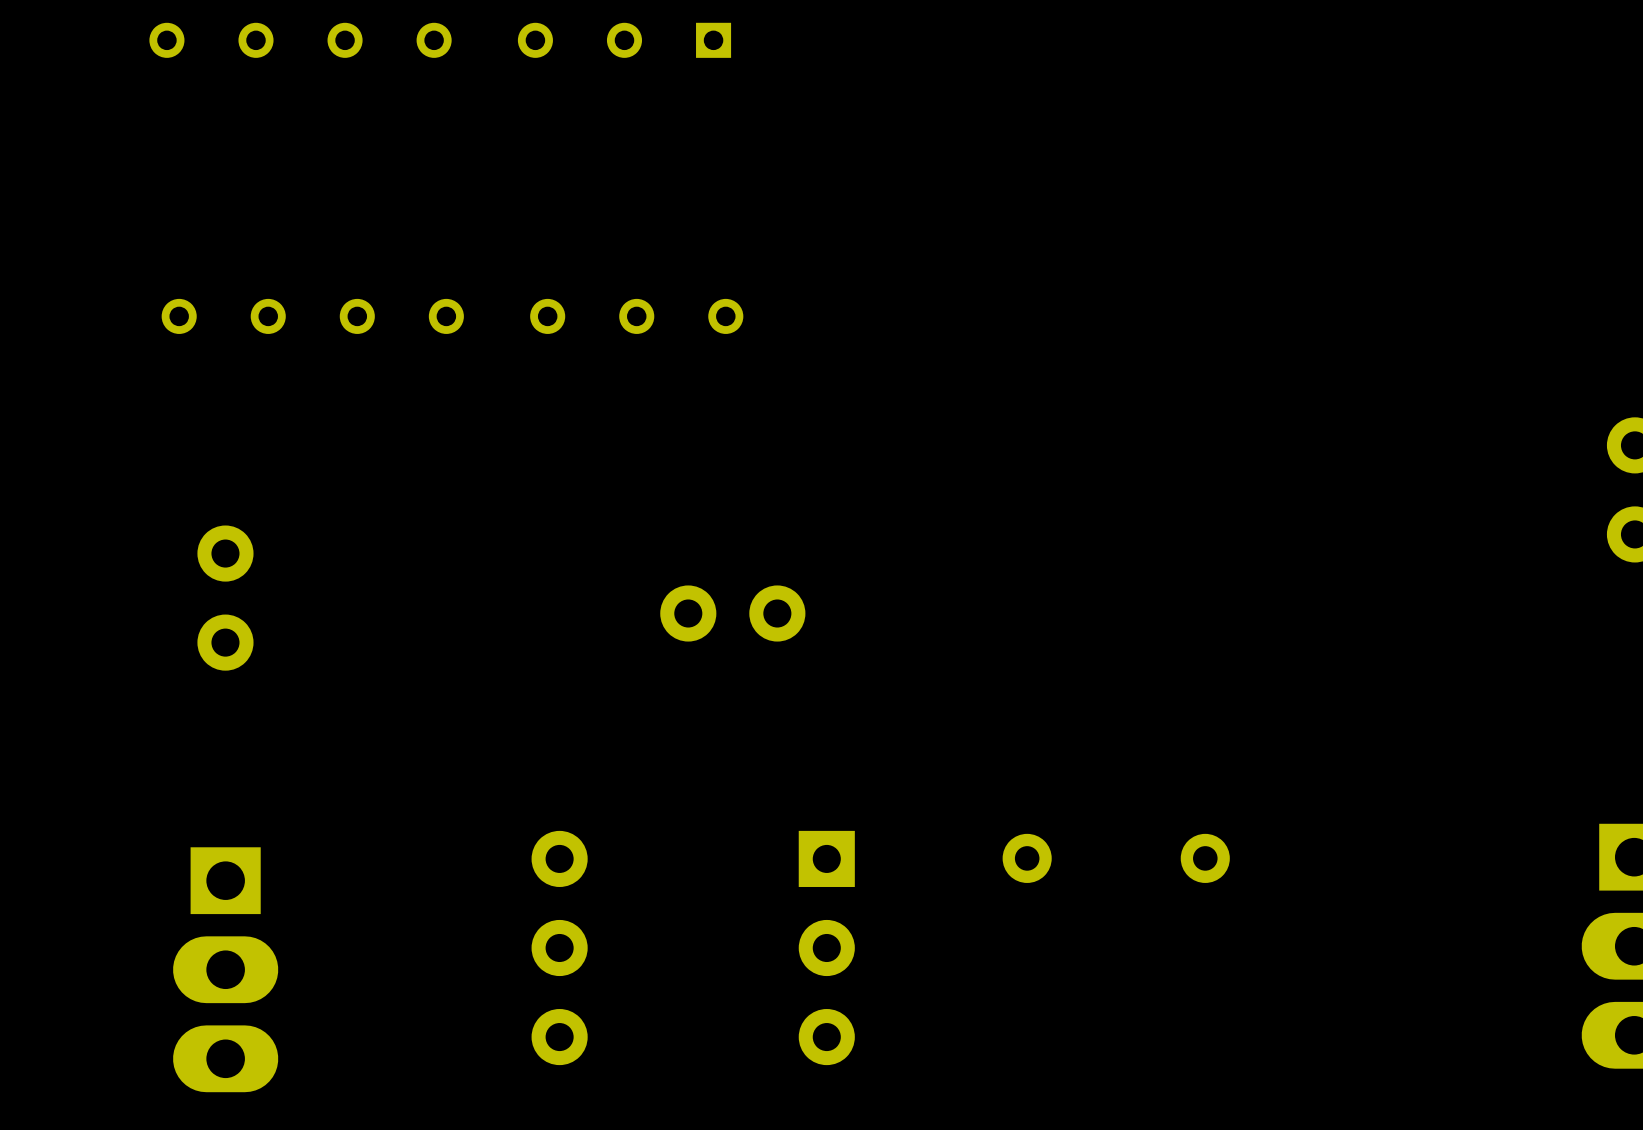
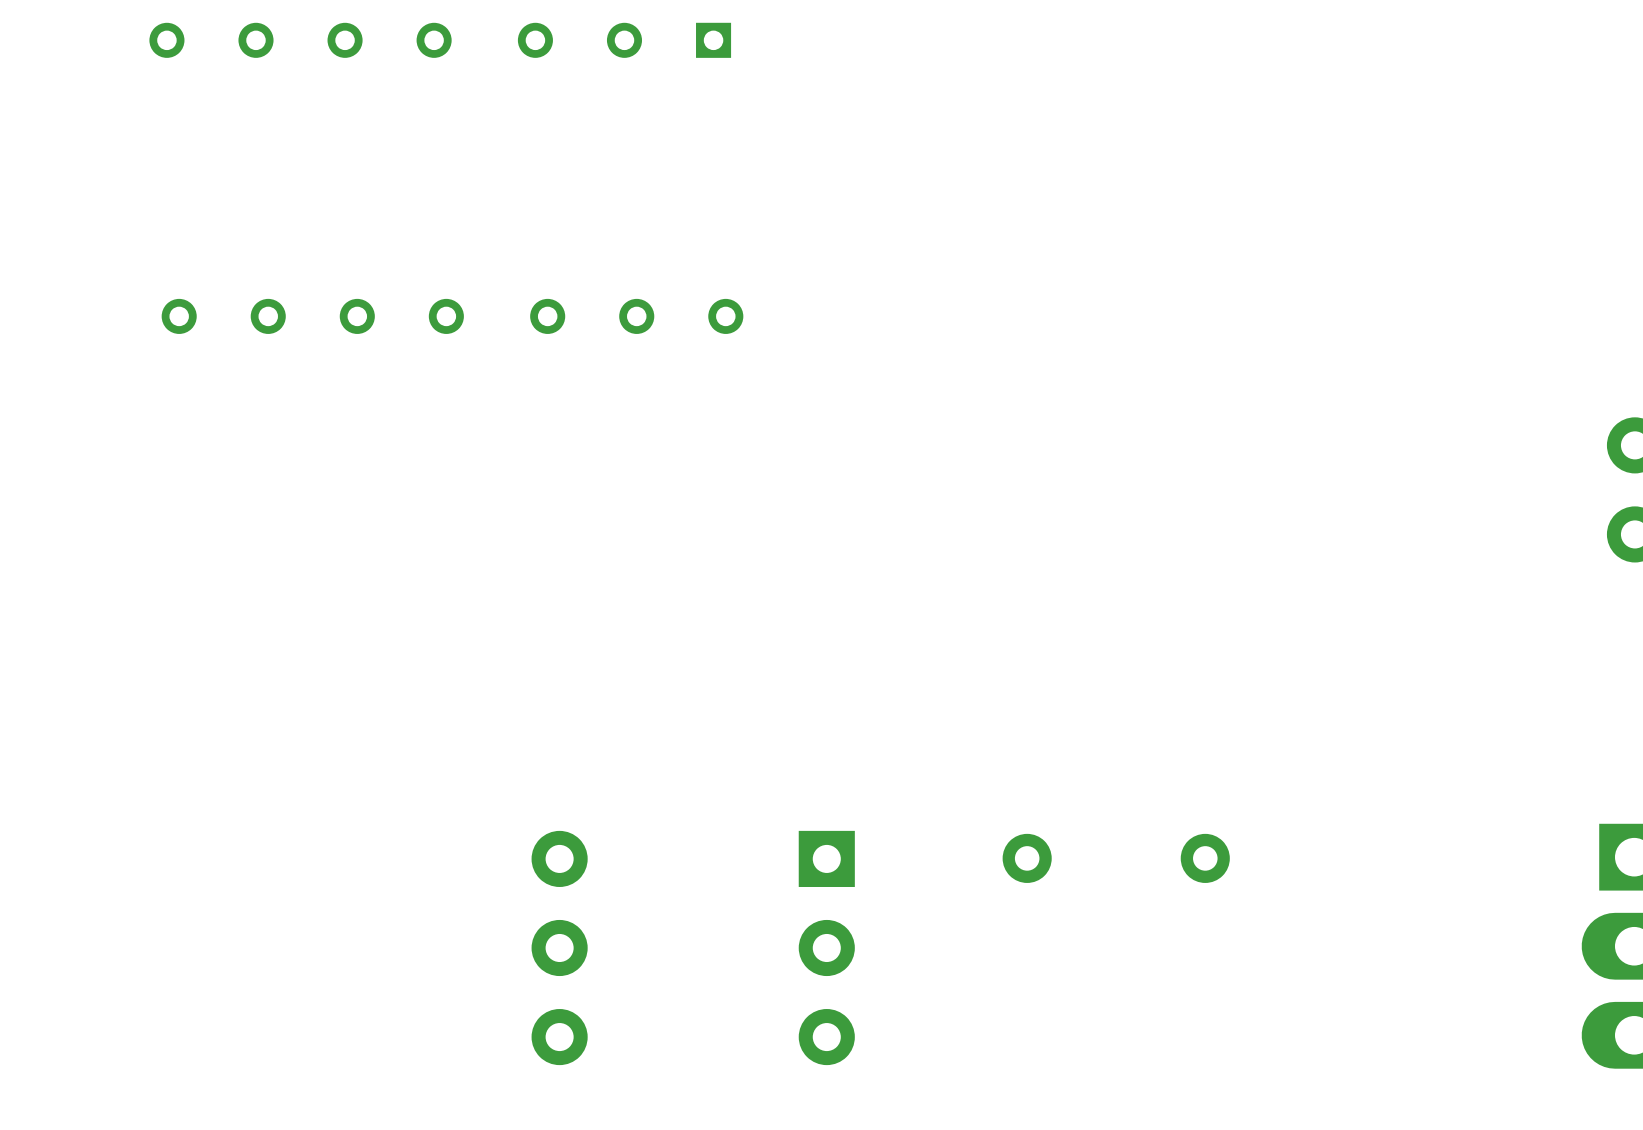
part: (225, 598) -> none
part: (732, 613) -> none
part: (225, 969) -> none

